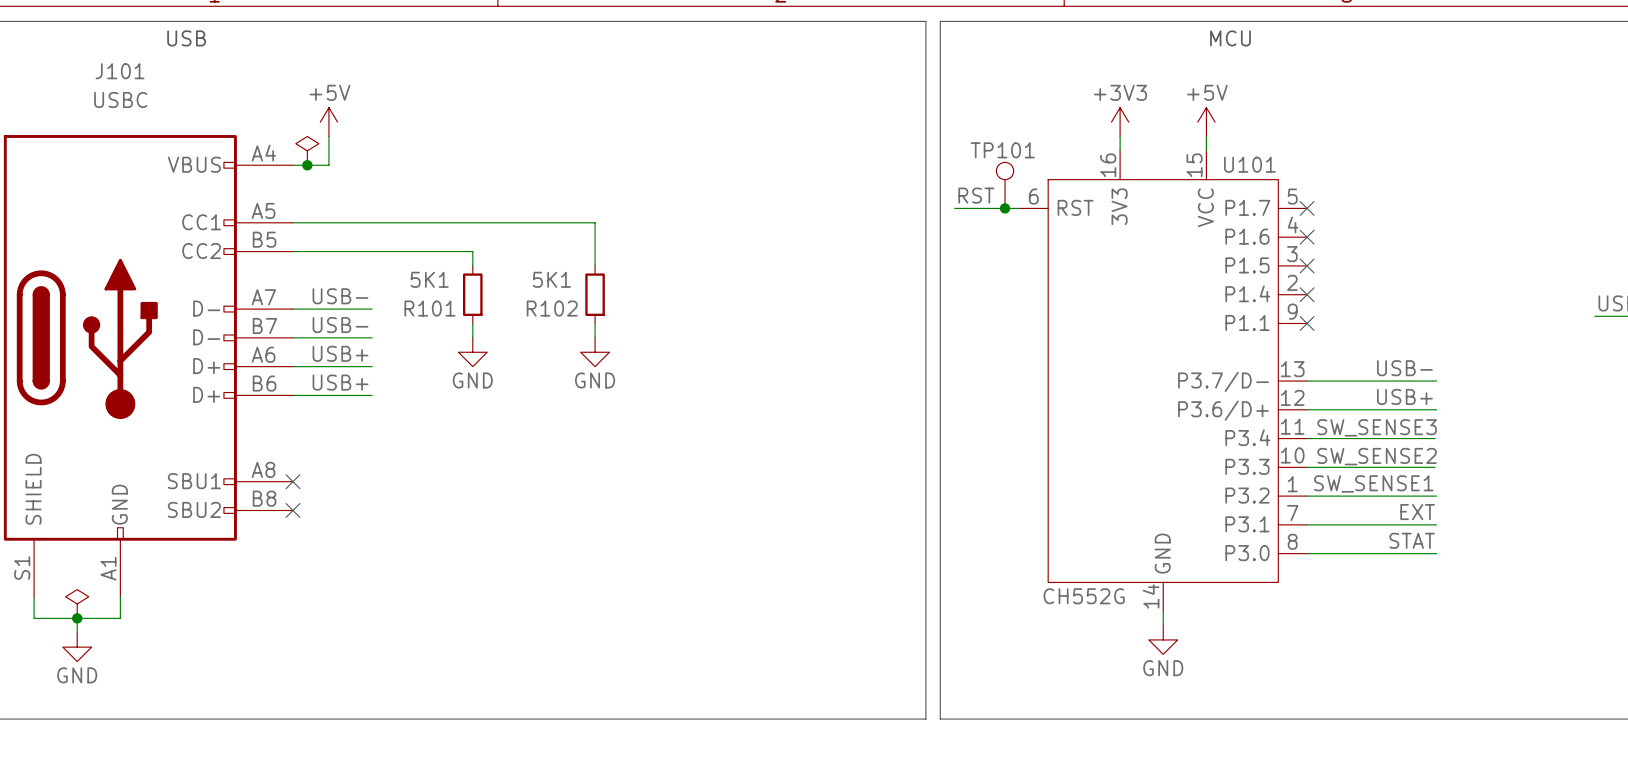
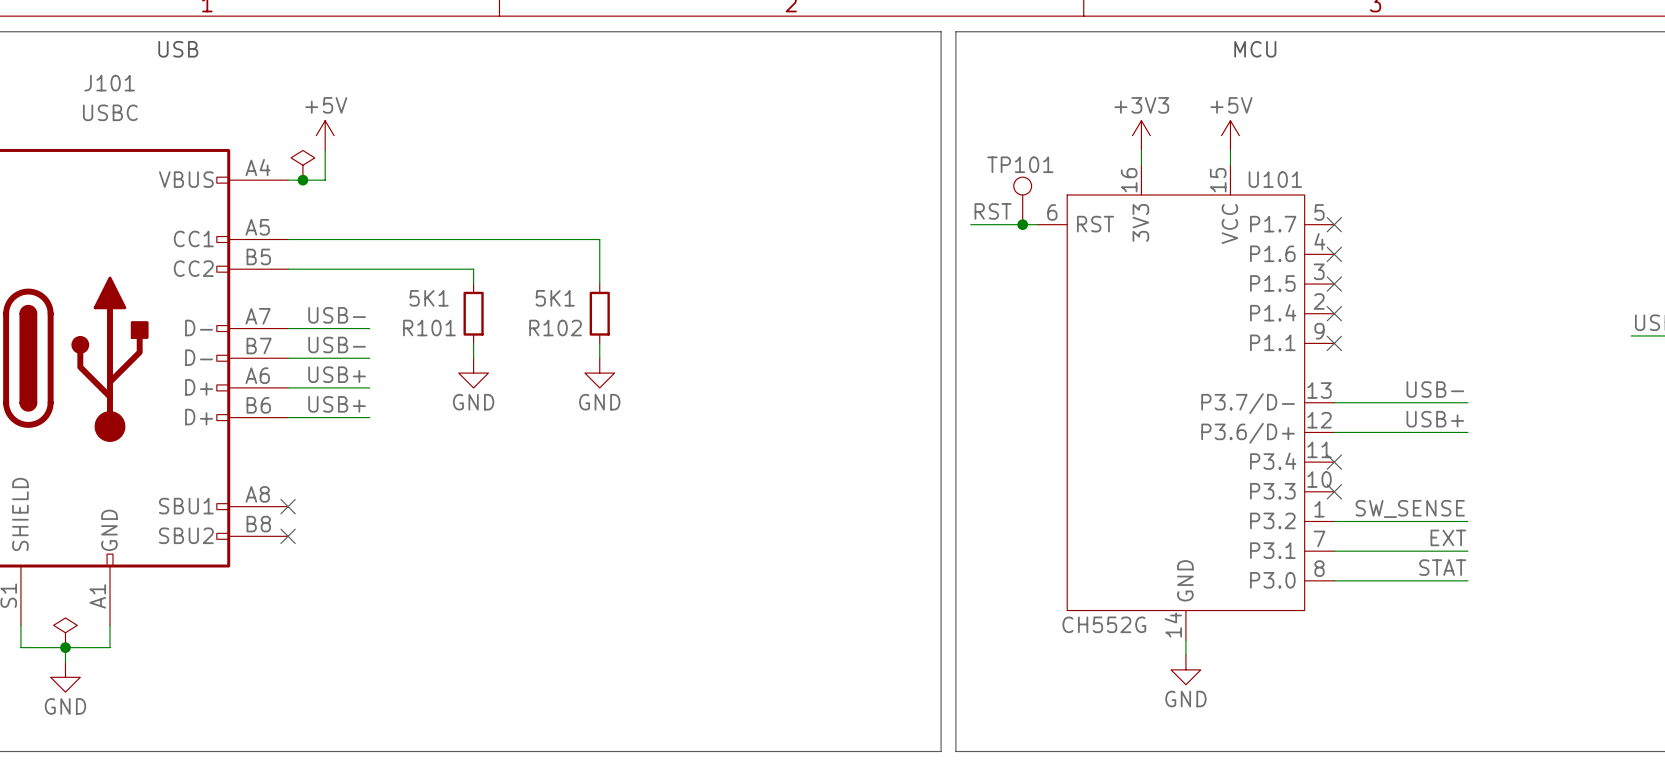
label: SW_SENSE3 (1377, 427) -> none
wire: (1307, 438) (1435, 438) -> none
no-connect mark: none -> (1334, 462)
label: SW_SENSE2 (1377, 456) -> none
wire: (1307, 467) (1435, 467) -> none
no-connect mark: none -> (1334, 491)
label: SW_SENSE1 (1373, 483) -> SW_SENSE (1410, 508)

